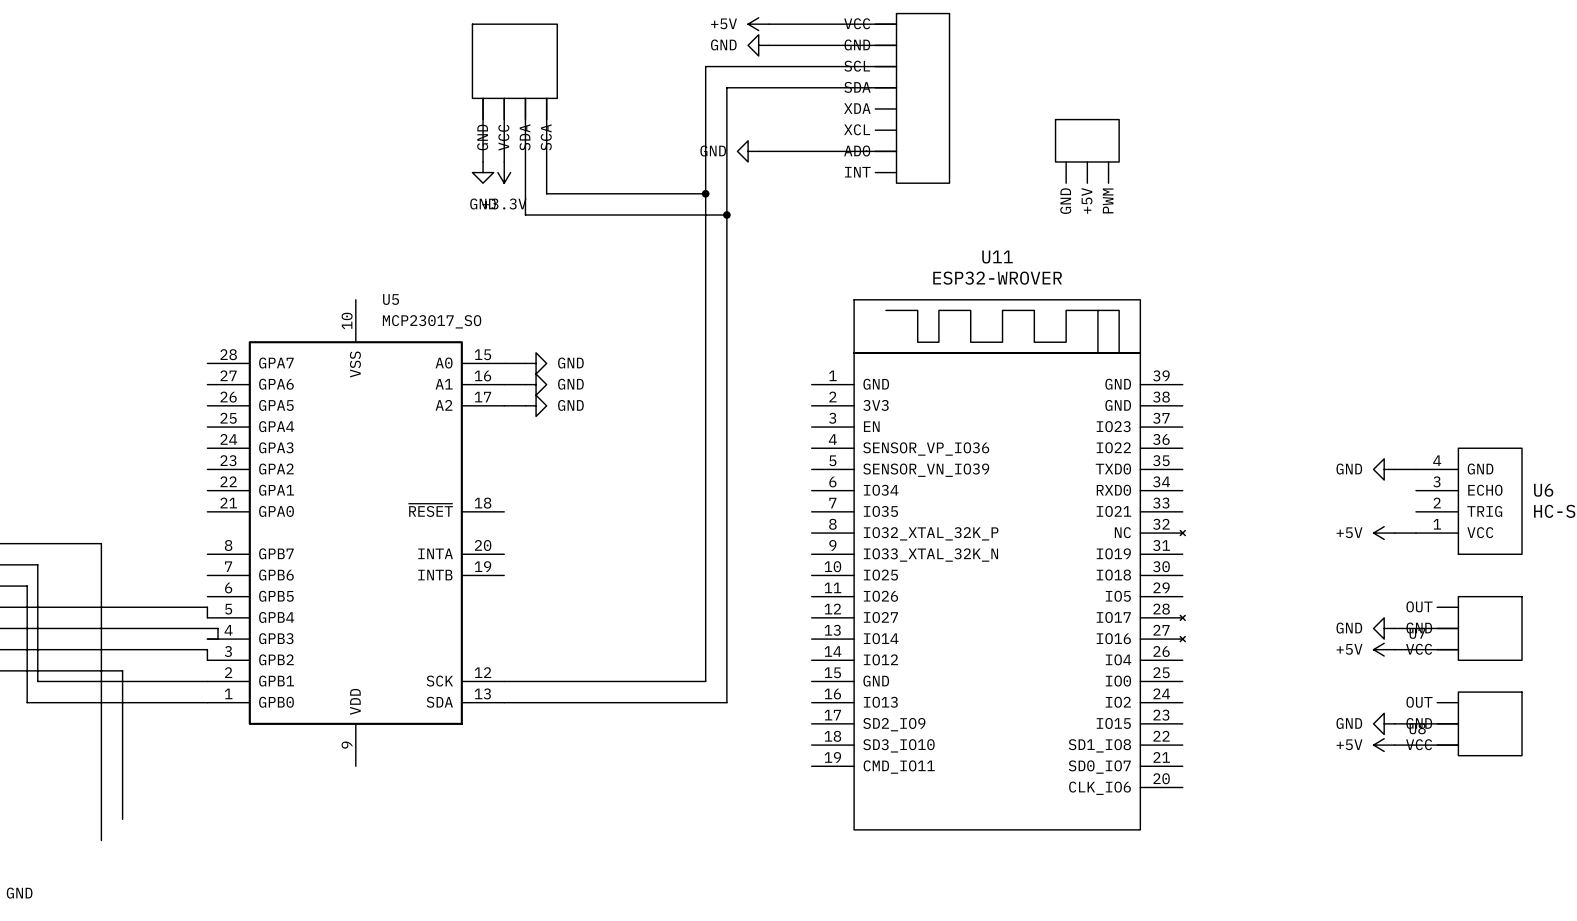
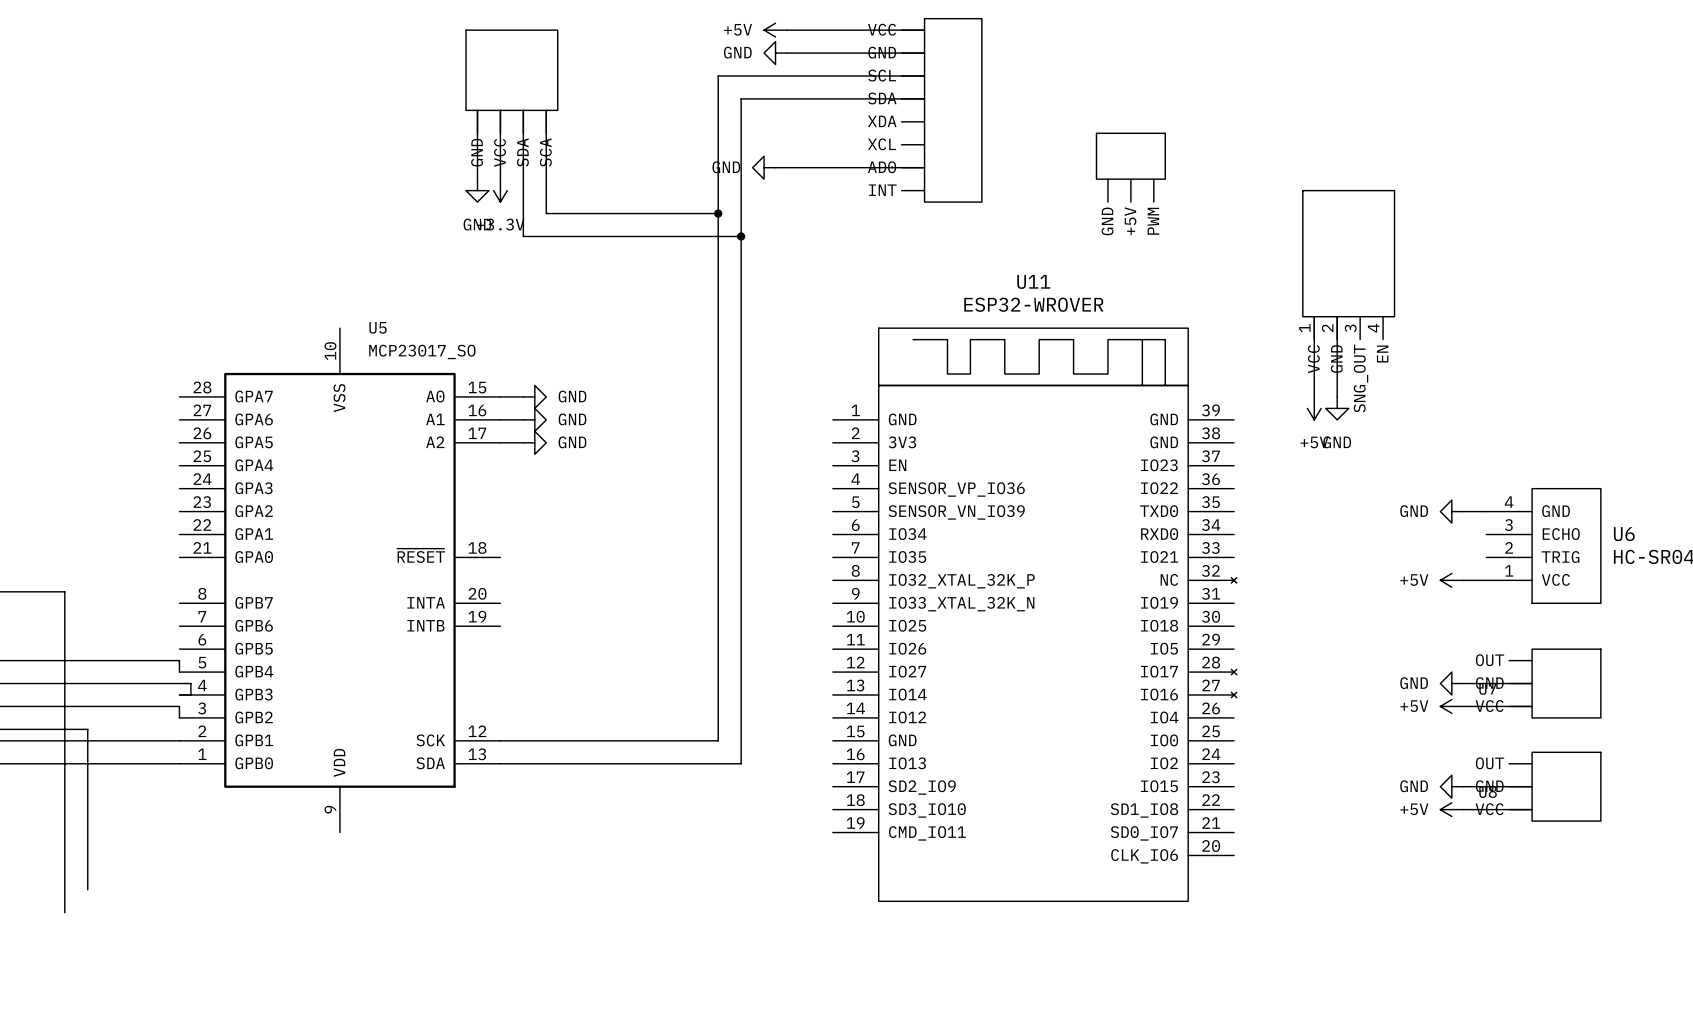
part: none -> (1348, 265)
wire: none -> (1314, 316) (1314, 396)
wire: none -> (1337, 316) (1337, 396)
power symbol: none -> +5V (1314, 408)
power symbol: none -> GND (1337, 408)

